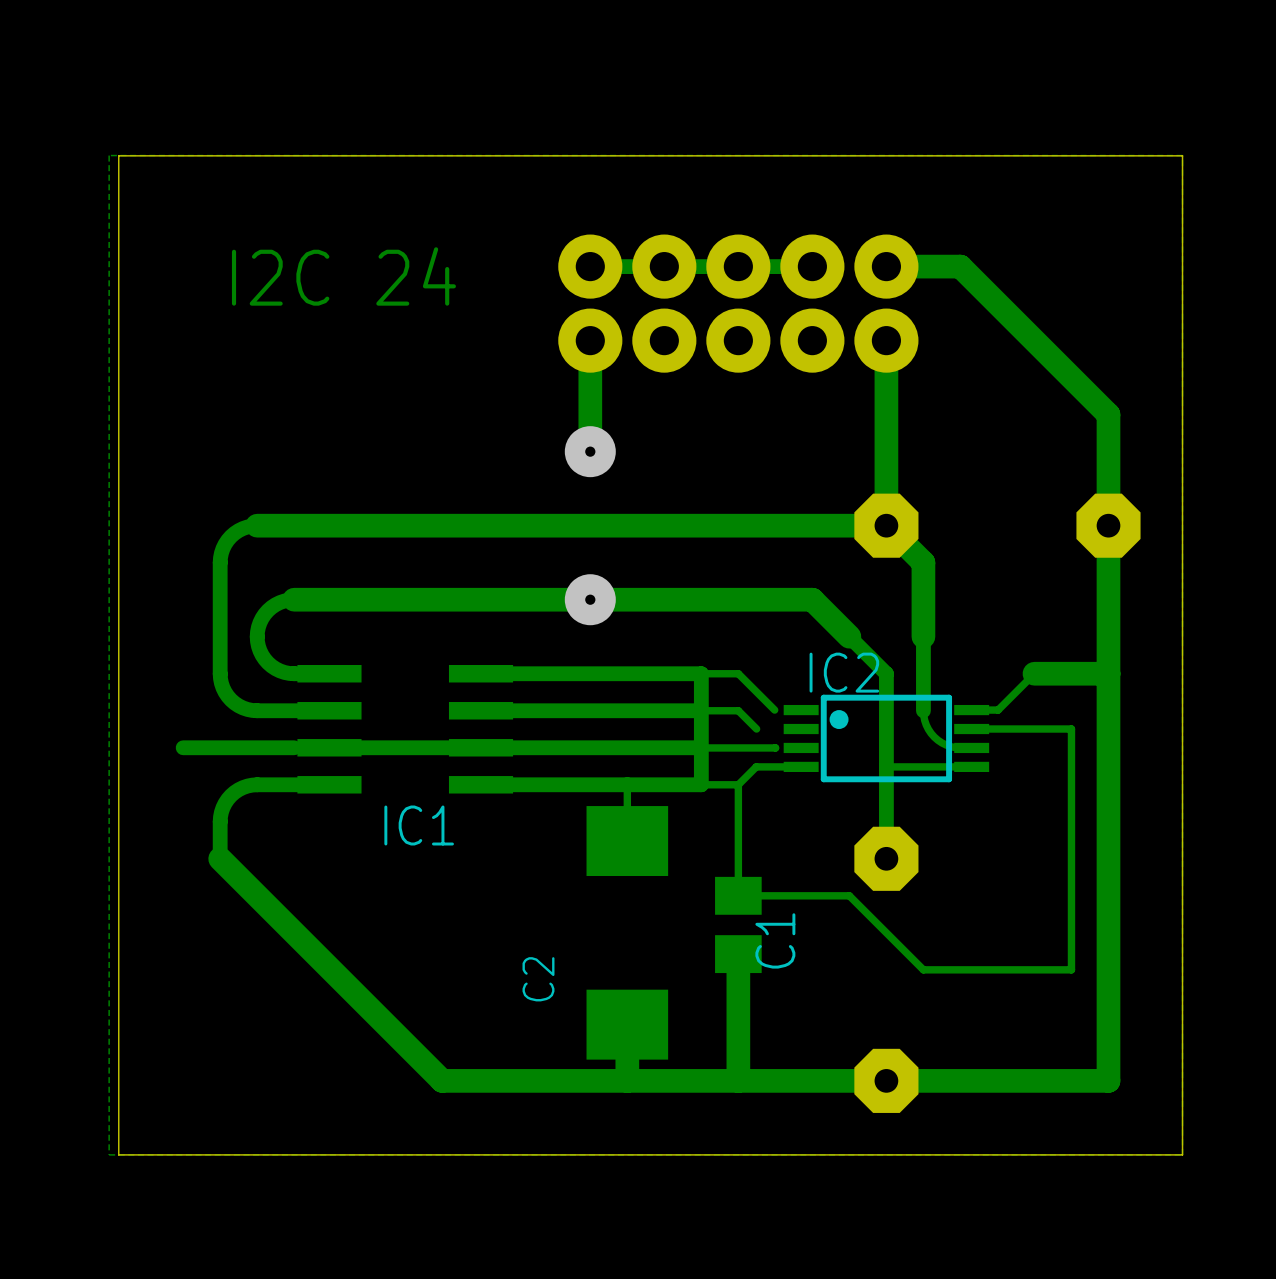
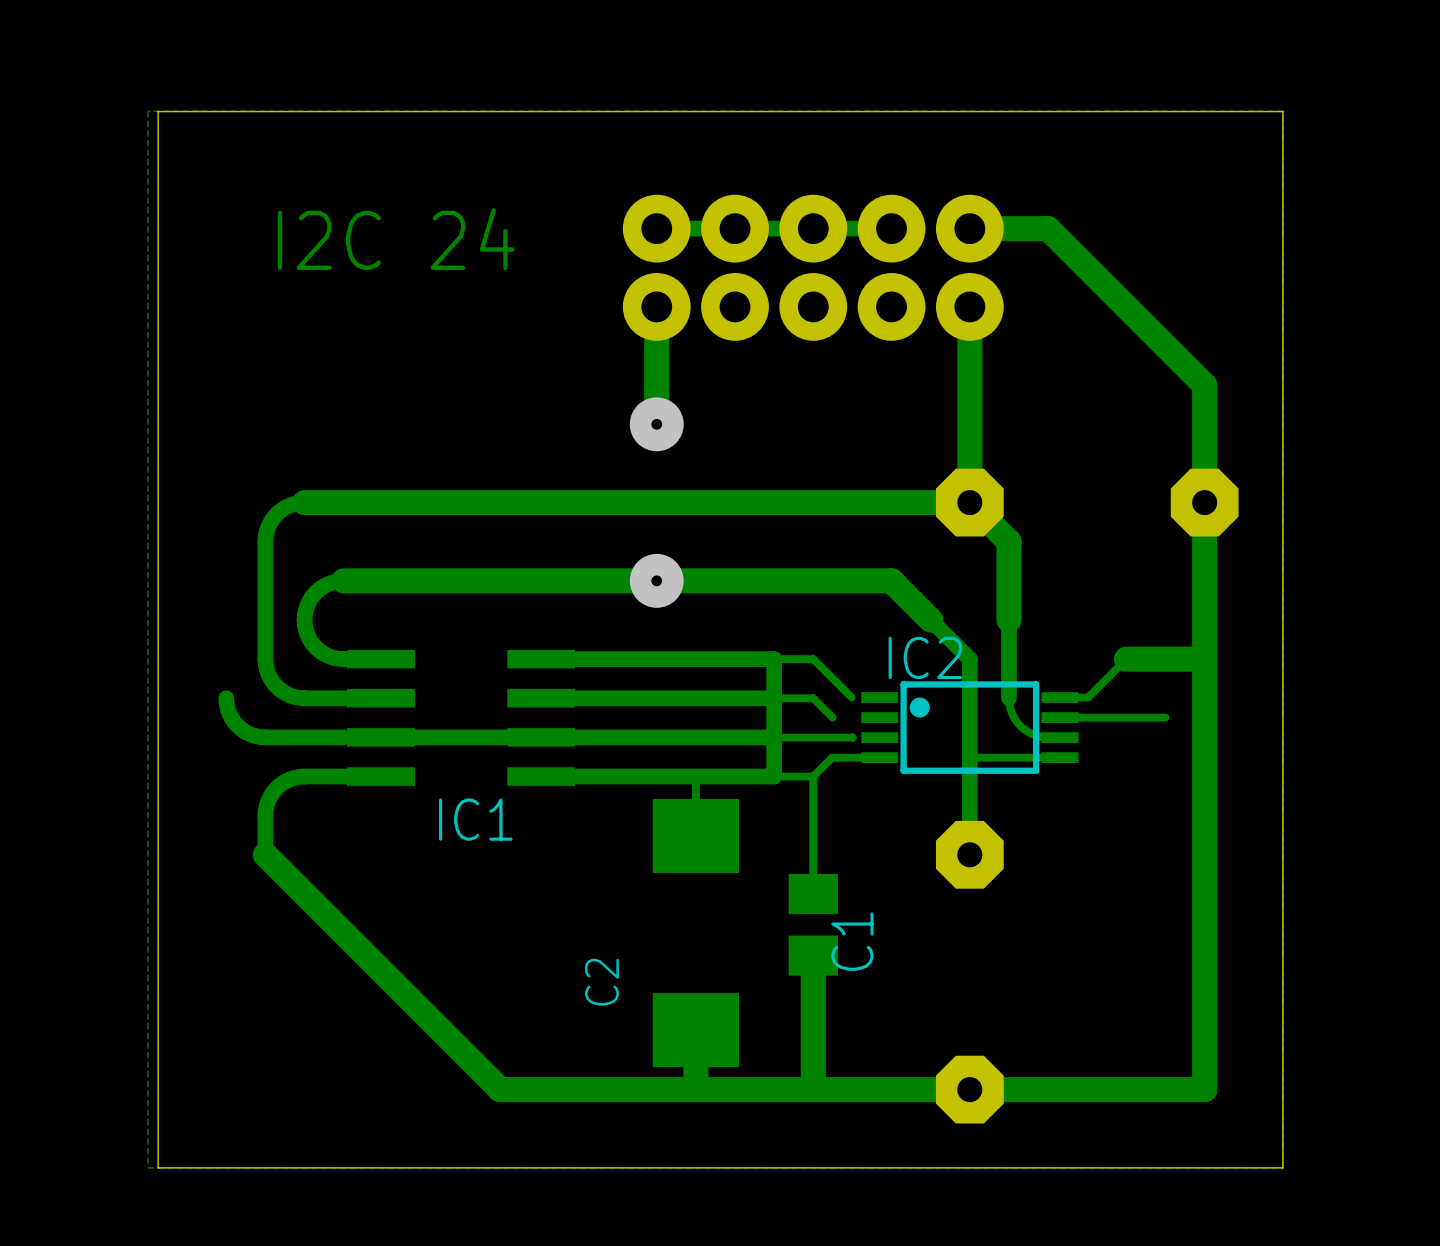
track: (1071, 729) (1071, 969) (923, 969) (849, 895) (738, 895) -> none
track: (220, 747) (183, 747) -> (265, 737) (250, 734) (237, 725) (229, 713) (226, 698)

